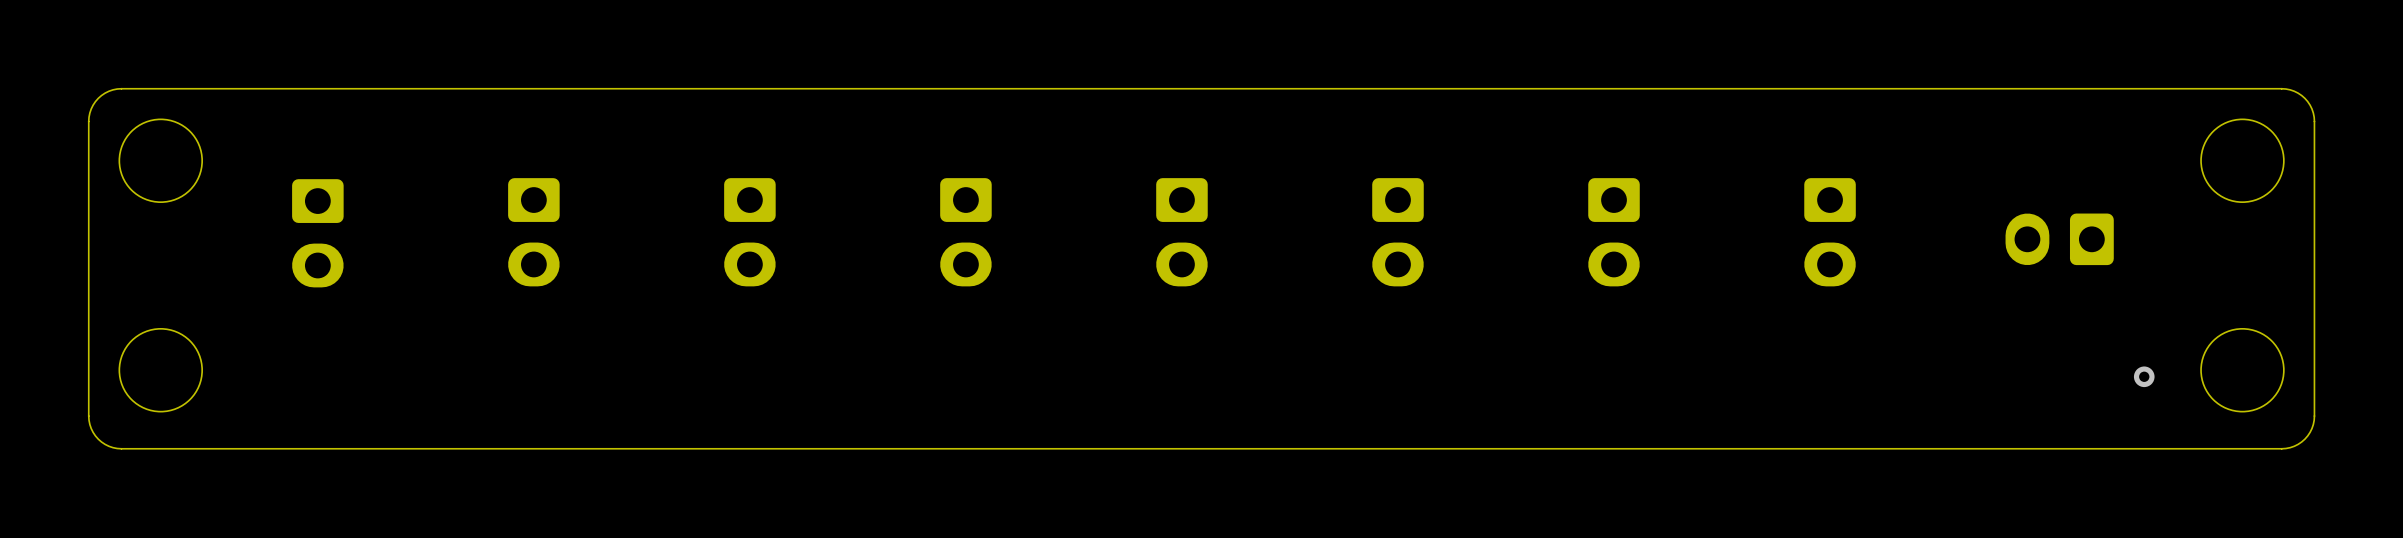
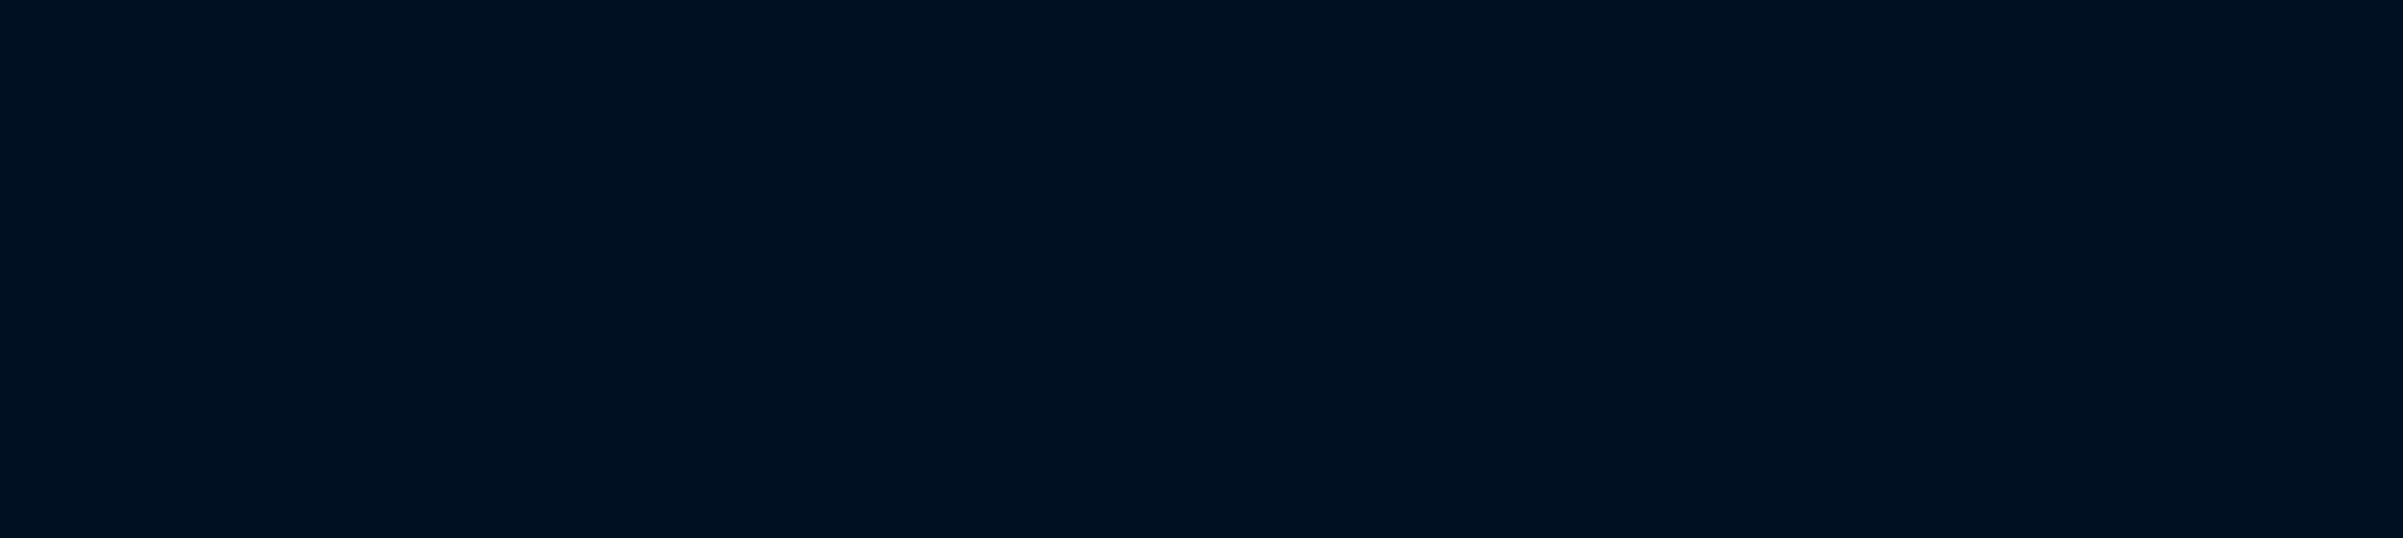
board edge: (2281, 88) (117, 89) (105, 93) (98, 98) (91, 108) (89, 117) (89, 420) (93, 432) (101, 442) (113, 447) (121, 448) (2285, 448) (2294, 446) (2304, 439) (2310, 432) (2314, 420) (2314, 121) (2311, 108) (2304, 98) (2294, 91) (2281, 88) -> none
round board edge: [118, 118, 203, 203] -> none
round board edge: [2200, 118, 2285, 203] -> none
part: (533, 232) -> none
part: (749, 232) -> none
part: (965, 232) -> none
part: (1181, 232) -> none
part: (1397, 232) -> none
part: (1614, 232) -> none
part: (1830, 232) -> none
part: (317, 233) -> none
part: (2059, 239) -> none
round board edge: [118, 328, 203, 413] -> none
round board edge: [2200, 328, 2285, 413] -> none
via: (2144, 376) -> none

